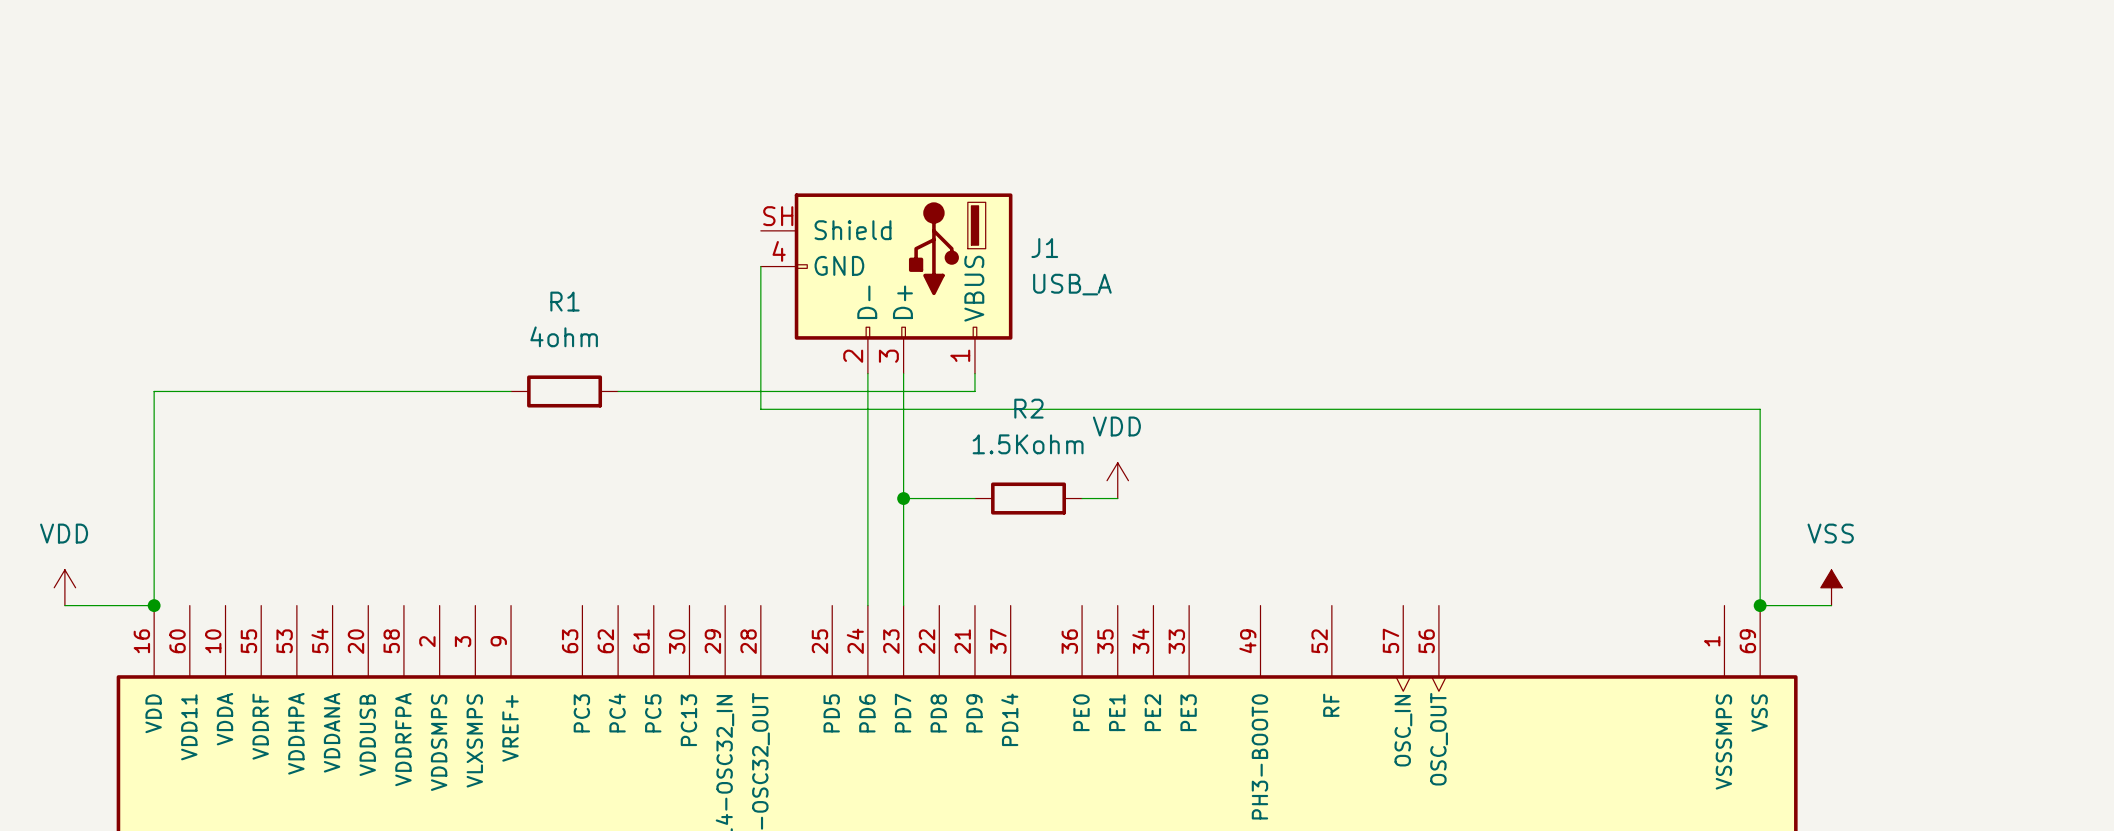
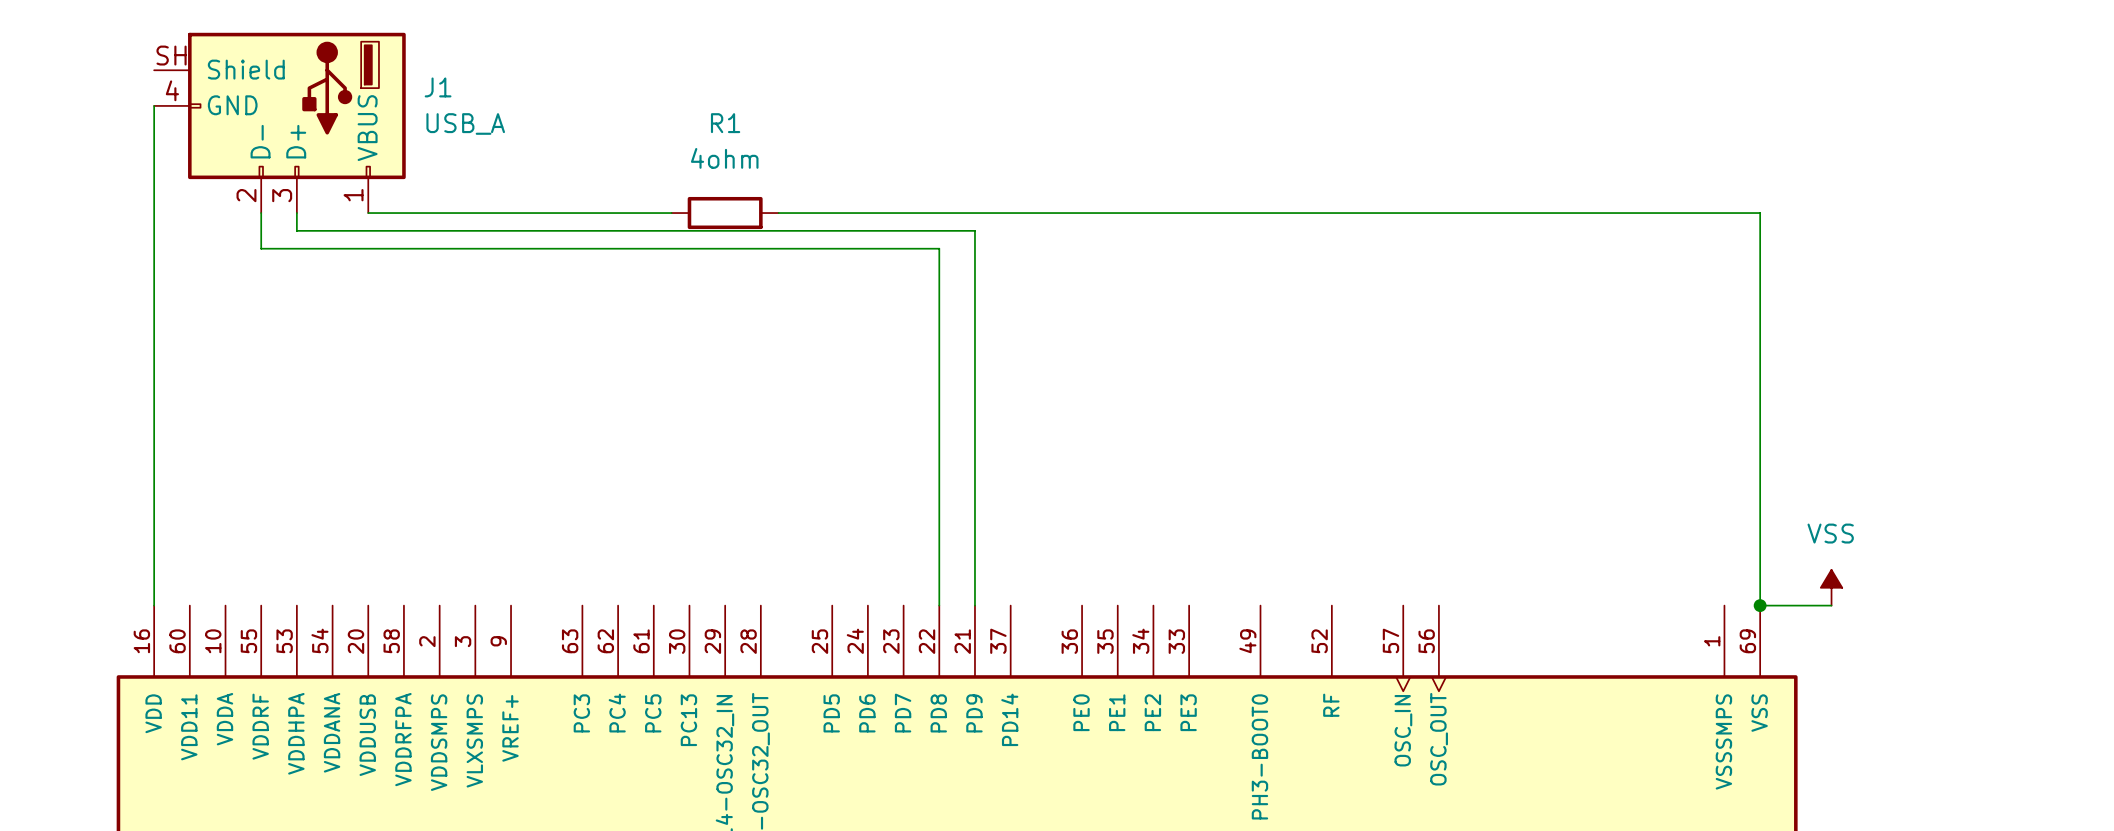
wire: none -> (261, 213) (261, 248) (939, 248) (939, 605)
wire: none -> (296, 213) (296, 230) (974, 230) (974, 373)
wire: none -> (368, 213) (671, 213)
wire: (760, 266) (760, 409) (1760, 409) -> (778, 213) (1760, 213) (1760, 409)
J1 position: (886, 283) -> (279, 122)
wire: (867, 373) (867, 605) -> none
wire: (903, 373) (903, 605) -> none
wire: (154, 391) (511, 391) -> (154, 391) (154, 105)
R1 position: (564, 391) -> (725, 213)
wire: (618, 391) (974, 391) -> (974, 605) (974, 391)
power symbol: VDD (1117, 480) -> none
wire: (903, 498) (974, 498) -> none
junction: (903, 498) -> none
R2: 1.5Kohm (1028, 498) -> none
wire: (1082, 498) (1117, 498) -> none
power symbol: VDD (64, 587) -> none
wire: (64, 605) (154, 605) -> none
junction: (154, 605) -> none

